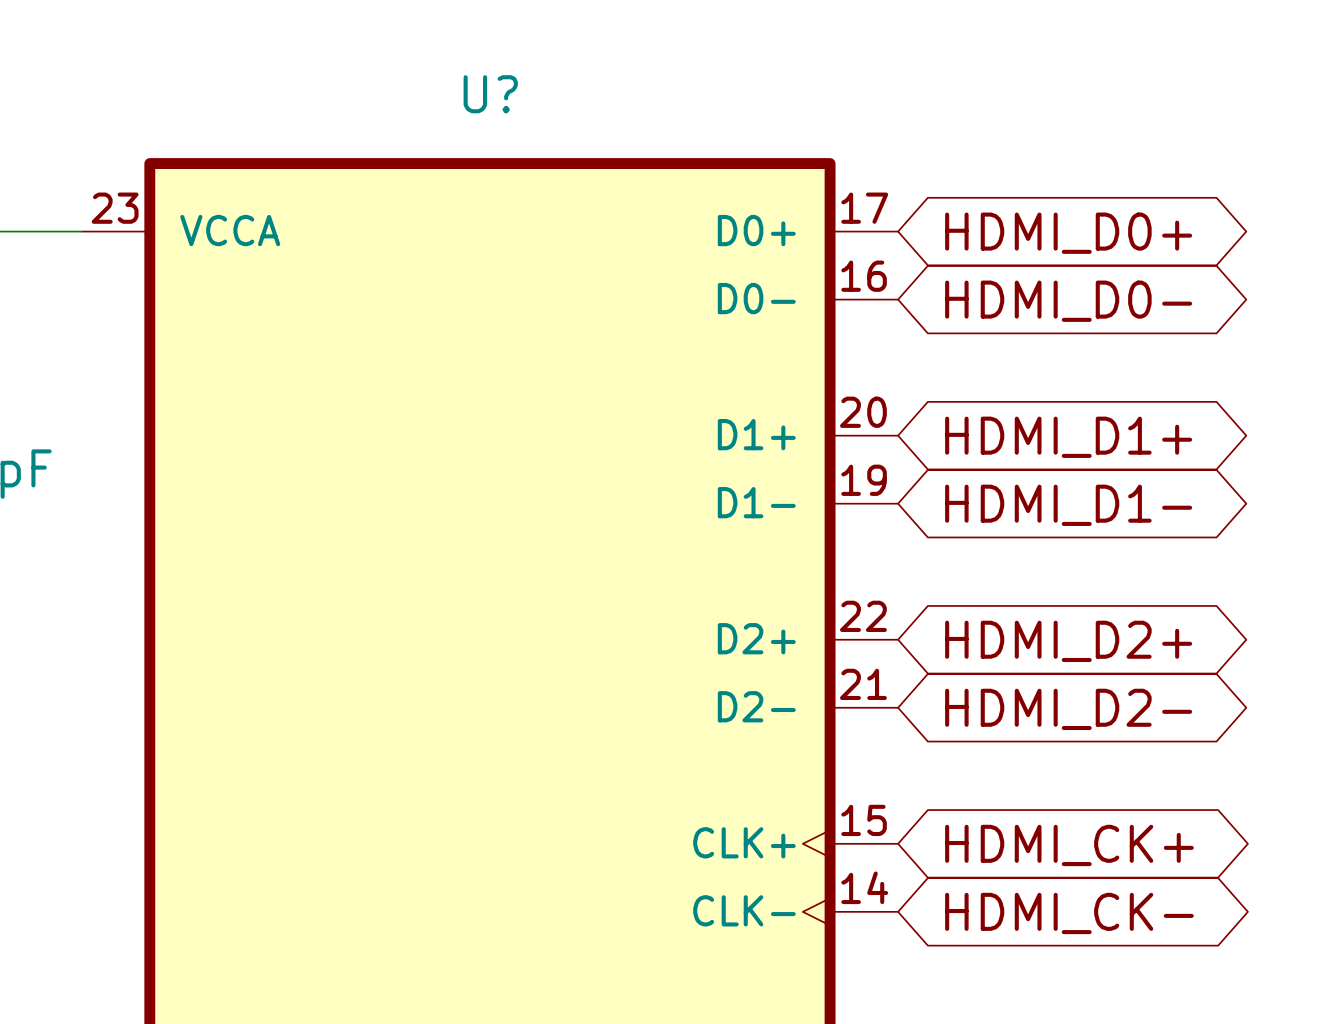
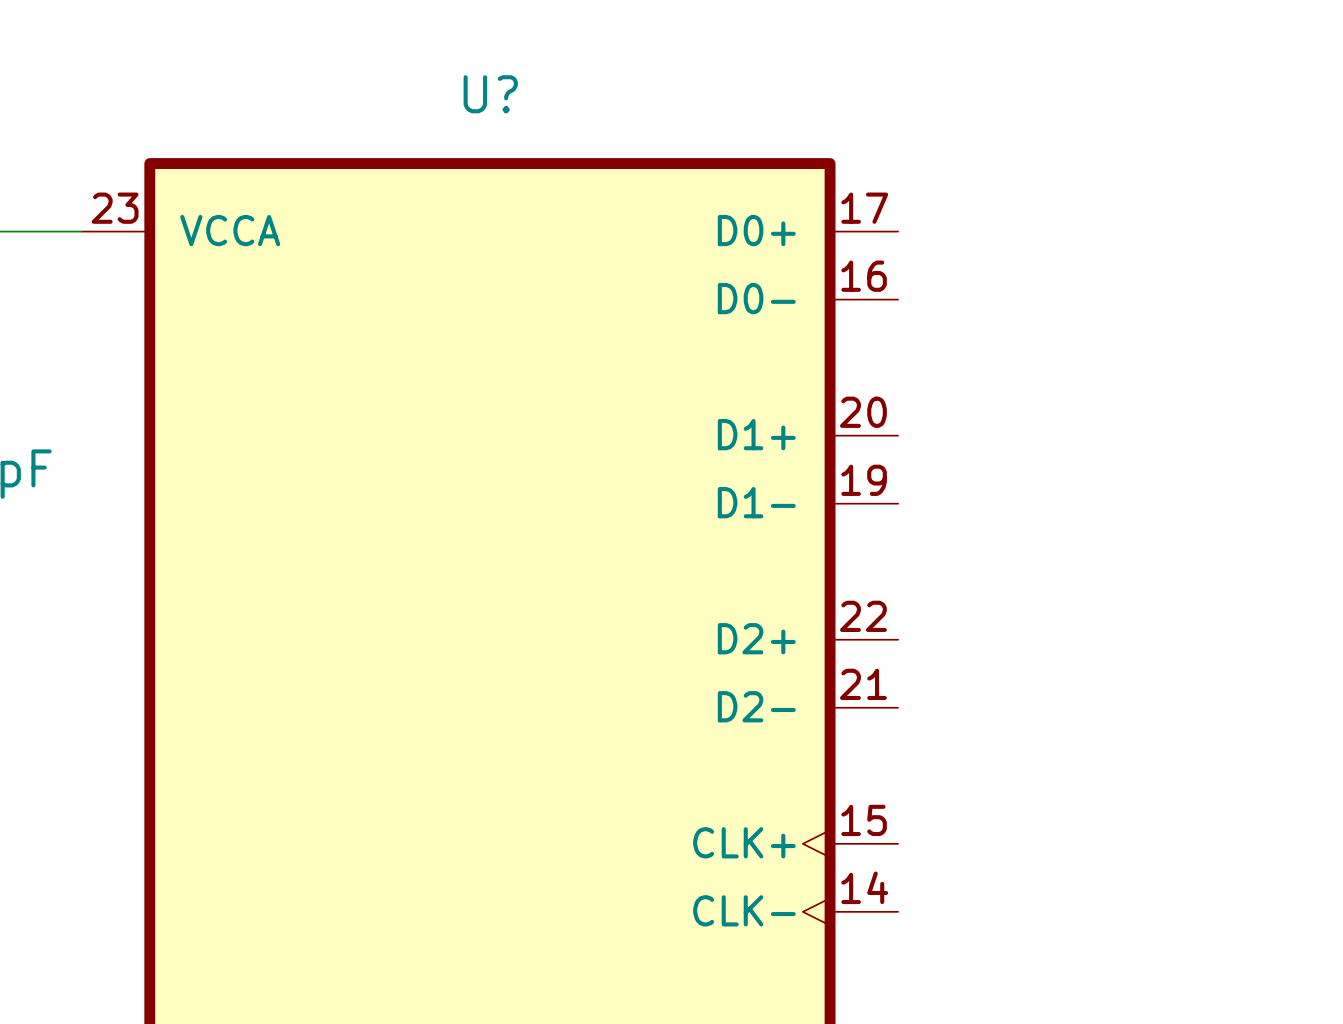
global label: HDMI_D0+ (1068, 233) -> none
global label: HDMI_D0- (1068, 301) -> none
global label: HDMI_D1+ (1068, 437) -> none
global label: HDMI_D1- (1068, 505) -> none
global label: HDMI_D2+ (1068, 641) -> none
global label: HDMI_D2- (1068, 709) -> none
global label: HDMI_CK+ (1069, 845) -> none
global label: HDMI_CK- (1069, 913) -> none

